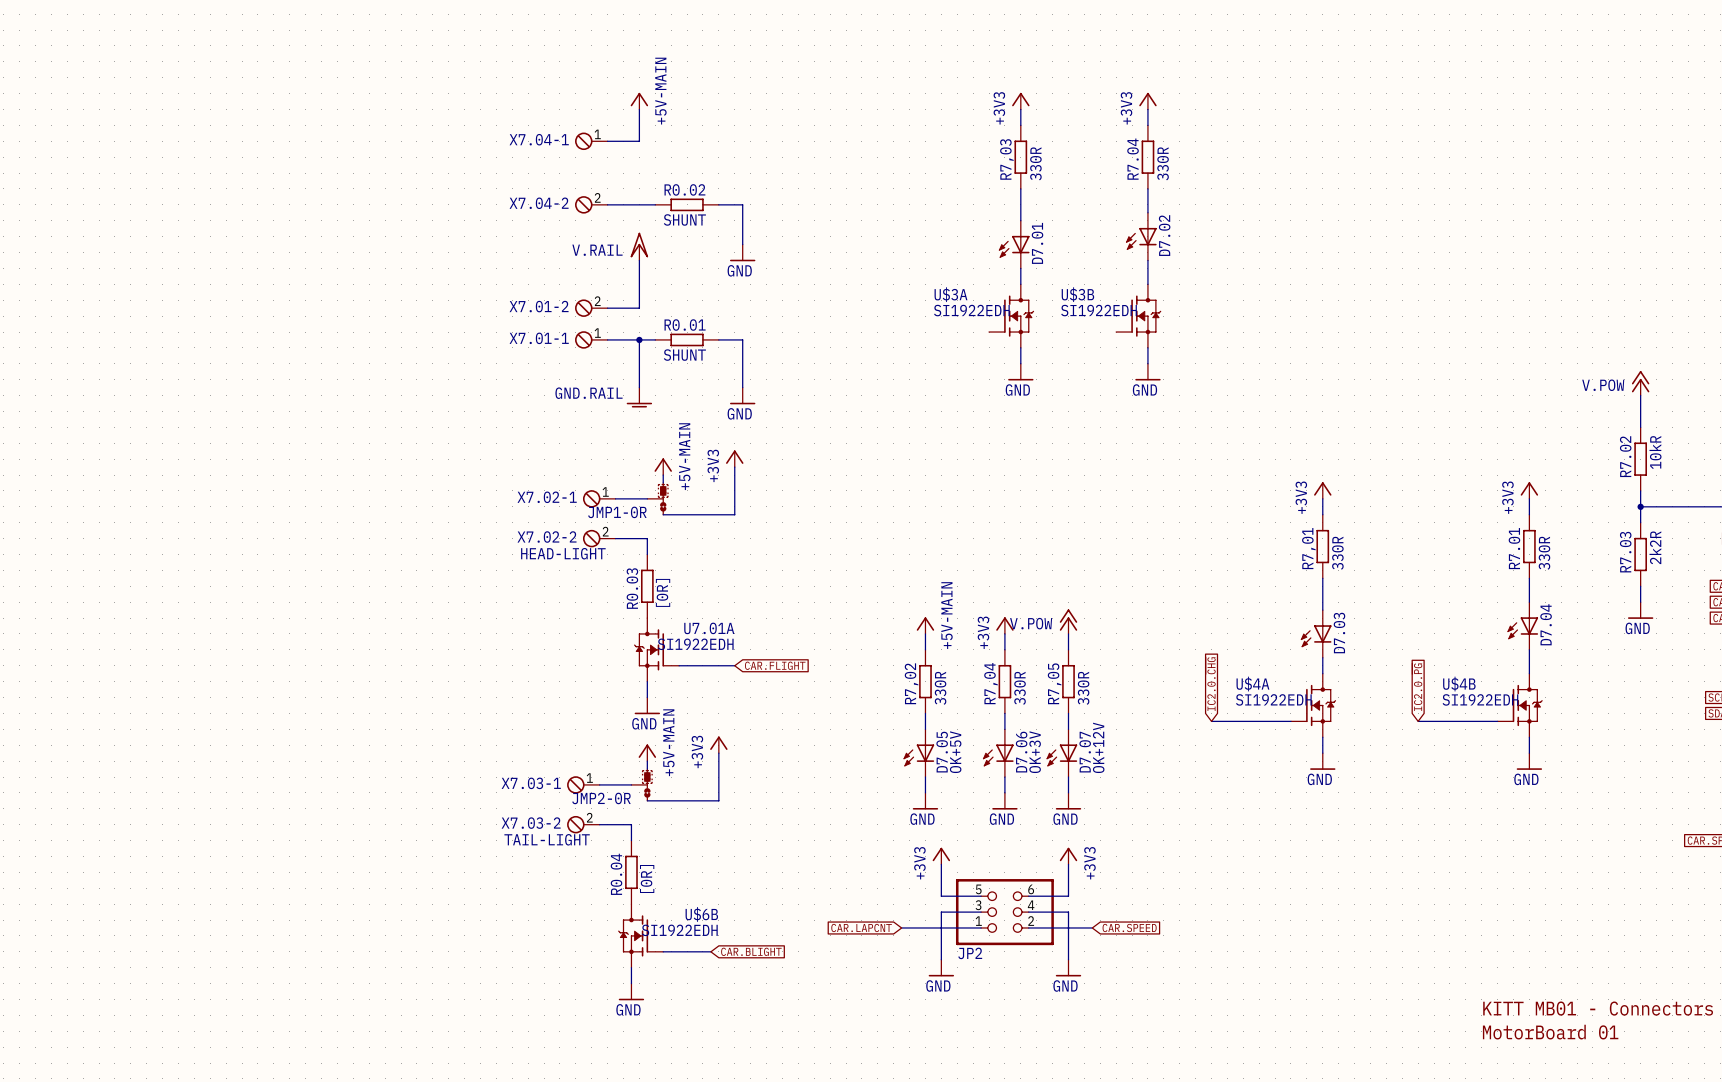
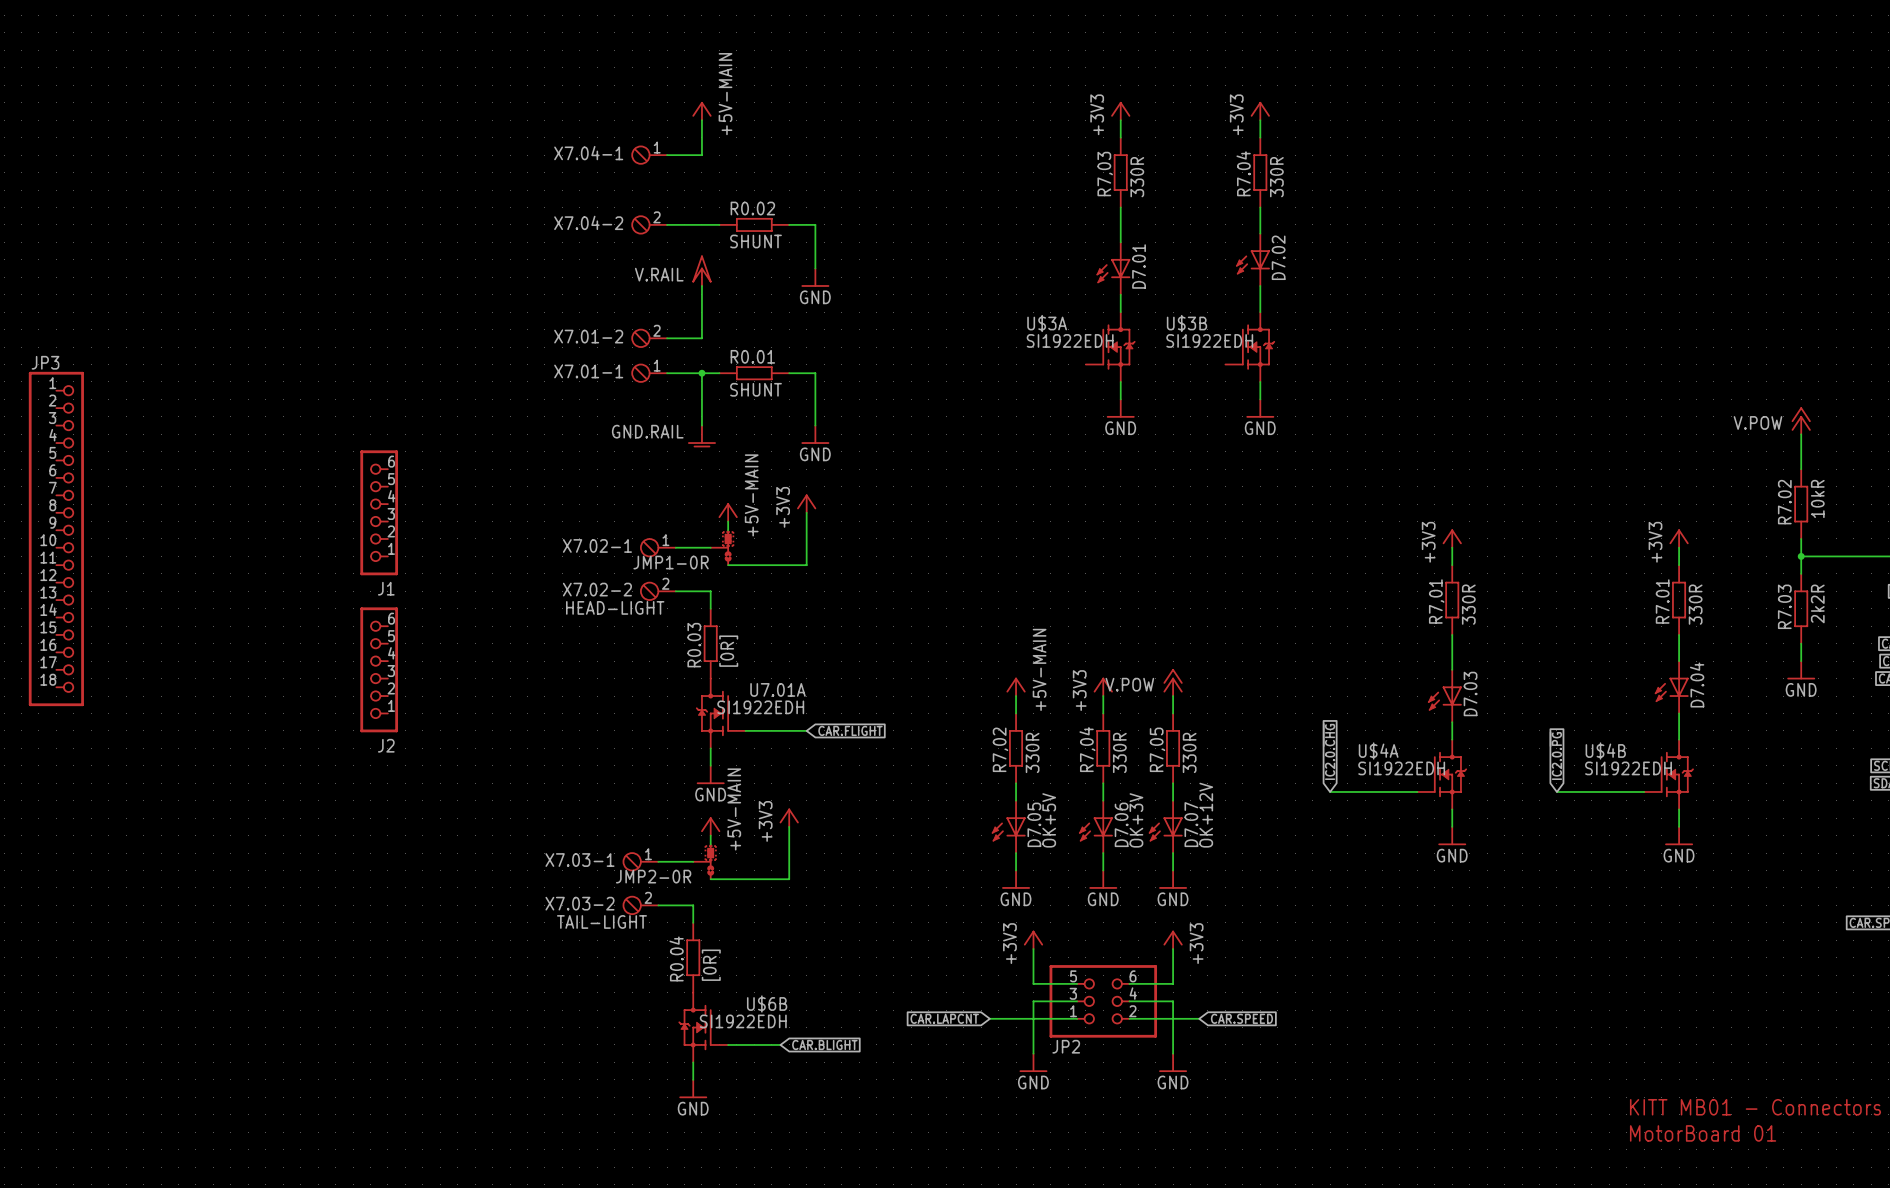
J1: none -> (379, 512)
JP3: none -> (56, 538)
J2: none -> (379, 669)

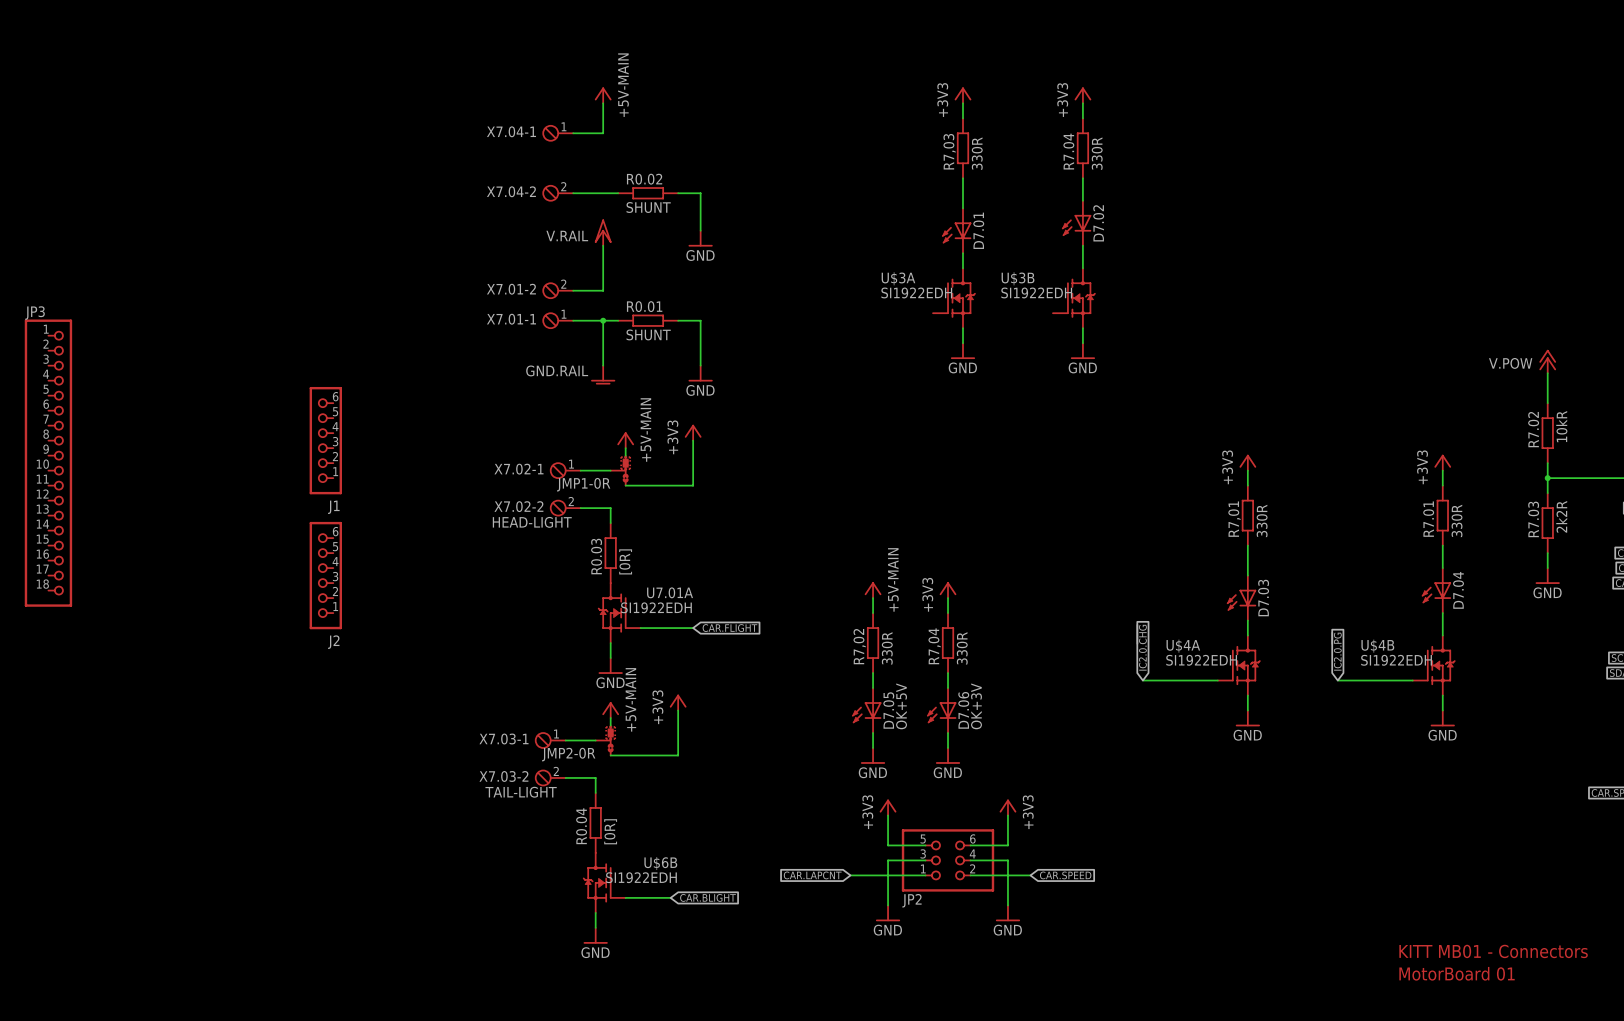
power symbol: V.POW (1173, 682) -> none
wire: (1173, 696) (1173, 713) -> none
R7,05: 330R (1173, 748) -> none
wire: (1173, 783) (1173, 800) -> none
D7.07: OK+12V (1165, 826) -> none
wire: (1173, 853) (1173, 870) -> none
power symbol: GND (1173, 879) -> none

